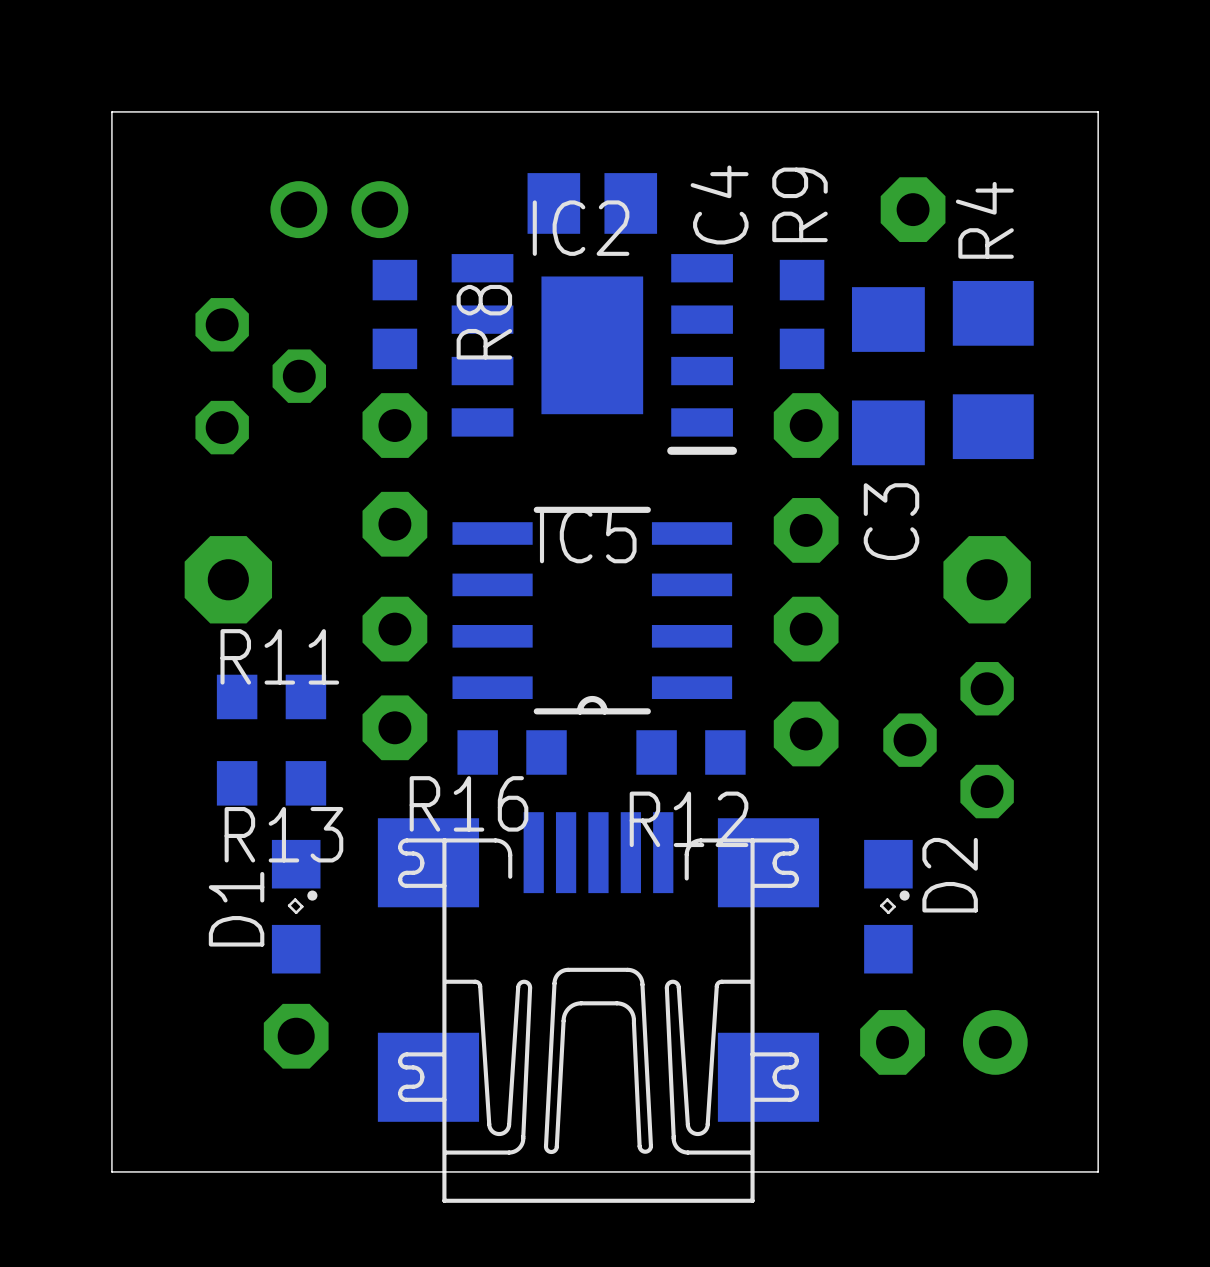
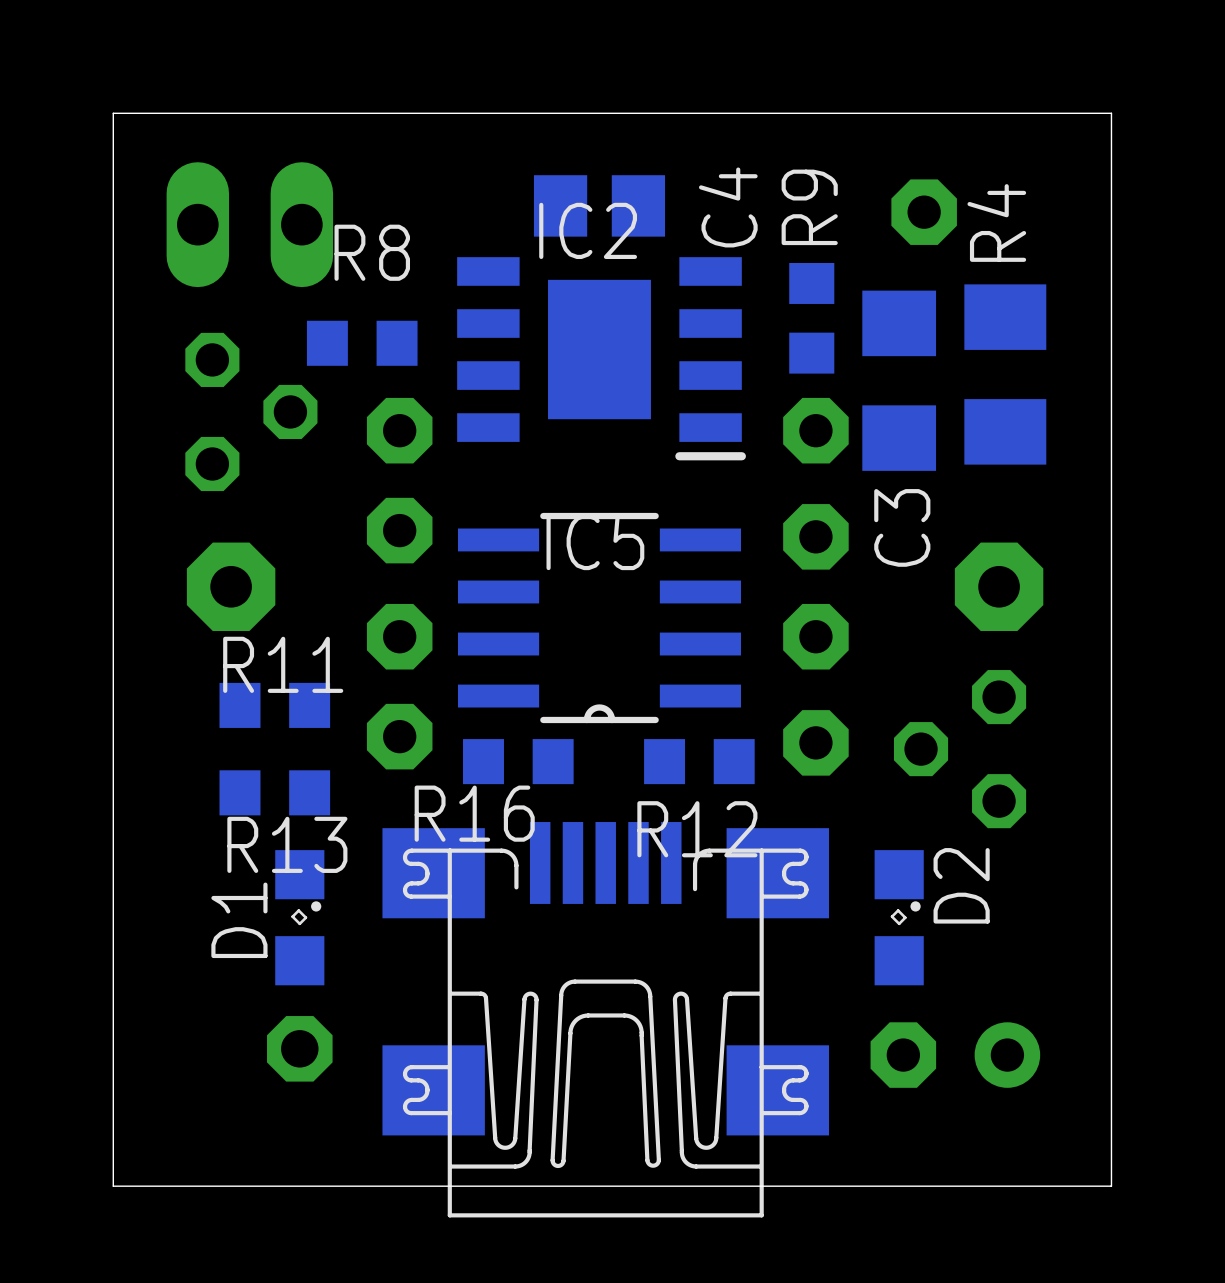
part: (339, 209) -> none
part: none -> (249, 224)
R8 rotation: 0° (394, 314) -> 90° clockwise (362, 343)
R8 name position: R8 (484, 322) -> R8 (372, 252)
part position: (260, 376) -> (251, 411)

